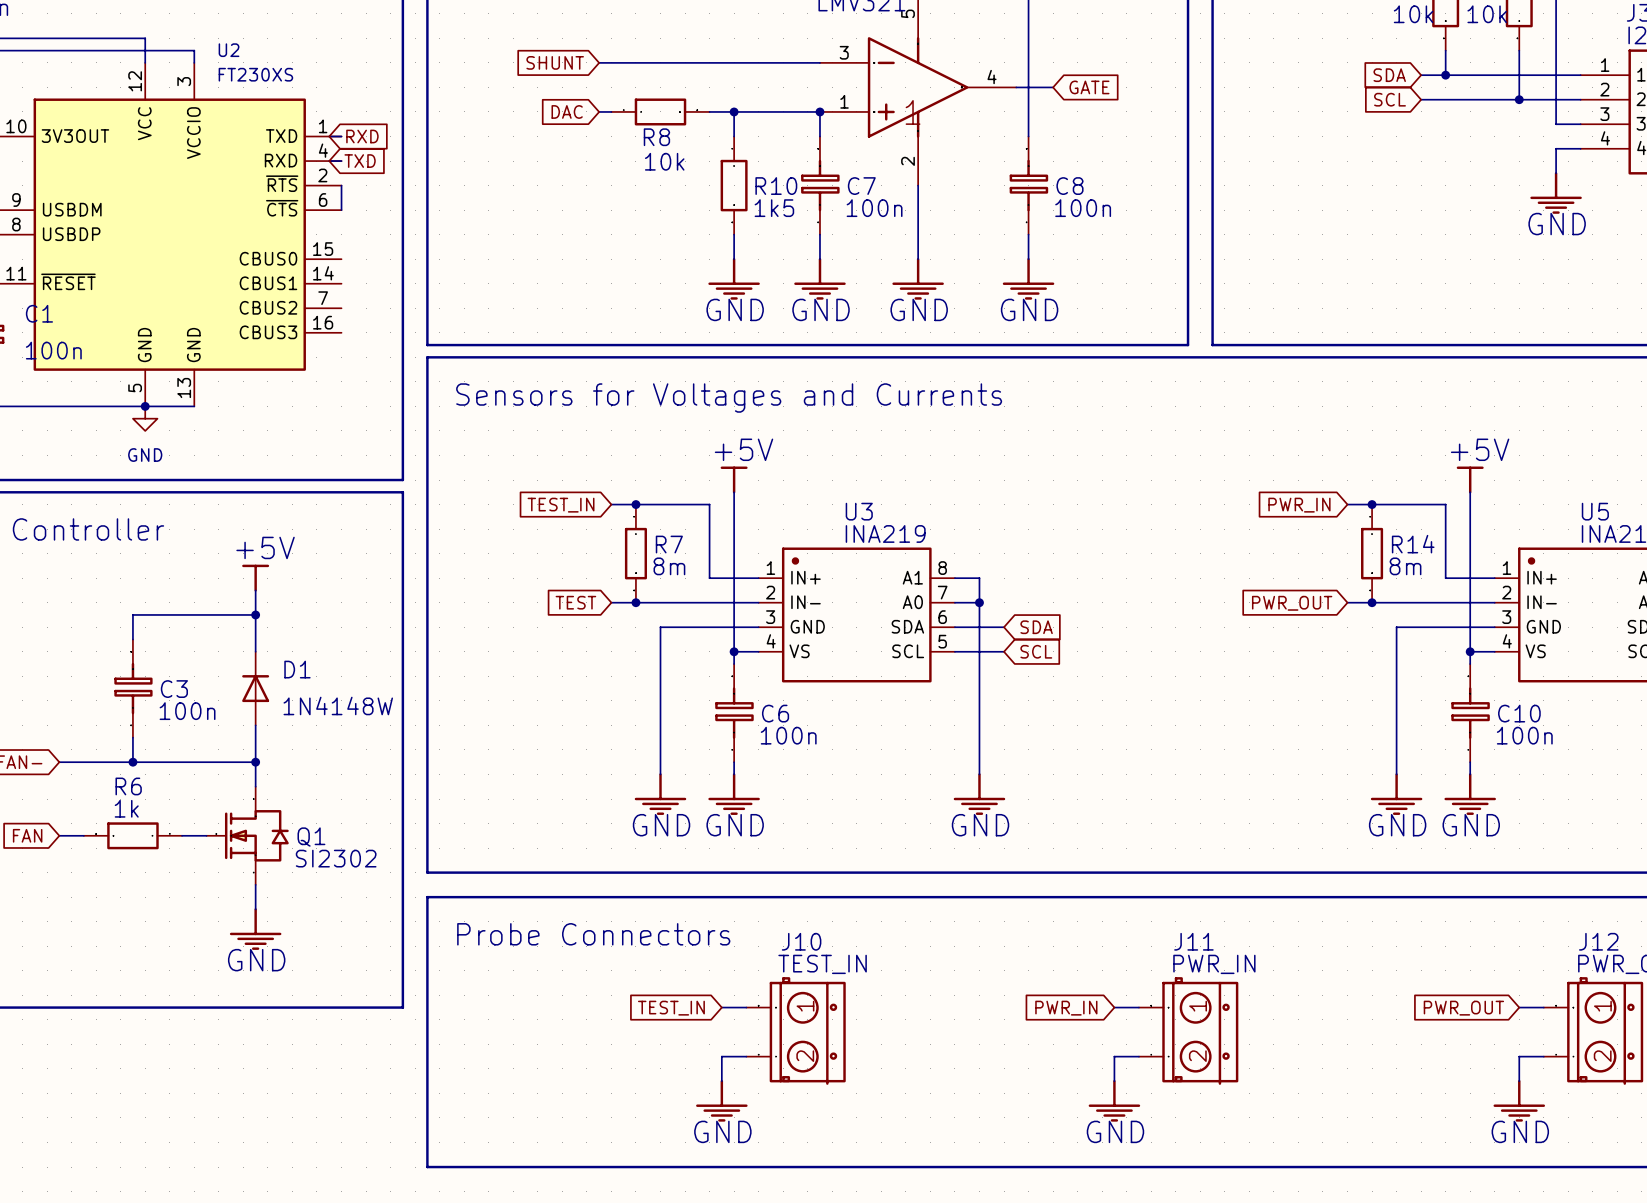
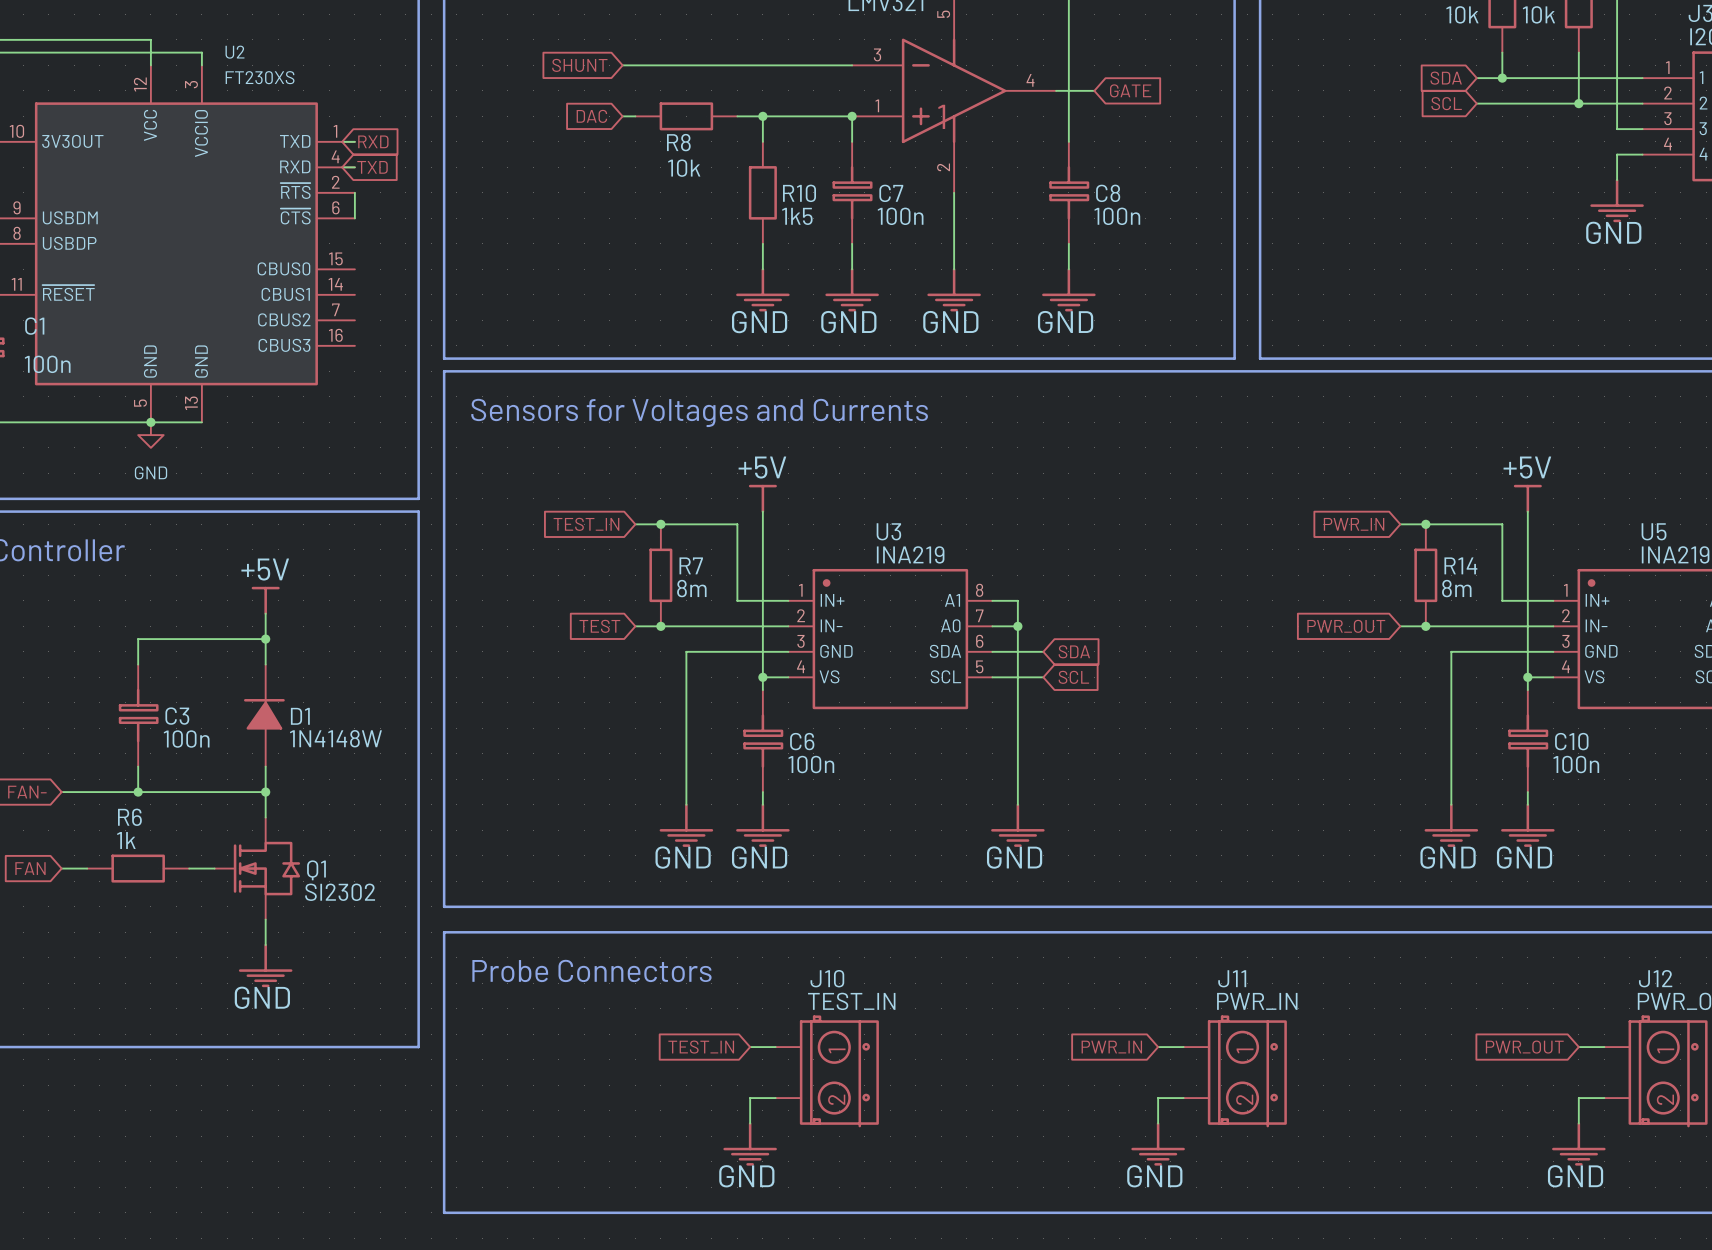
D1 symbol: [242, 651, 270, 726] -> [243, 664, 285, 767]
D1 name position: D1 (297, 669) -> D1 (300, 716)

